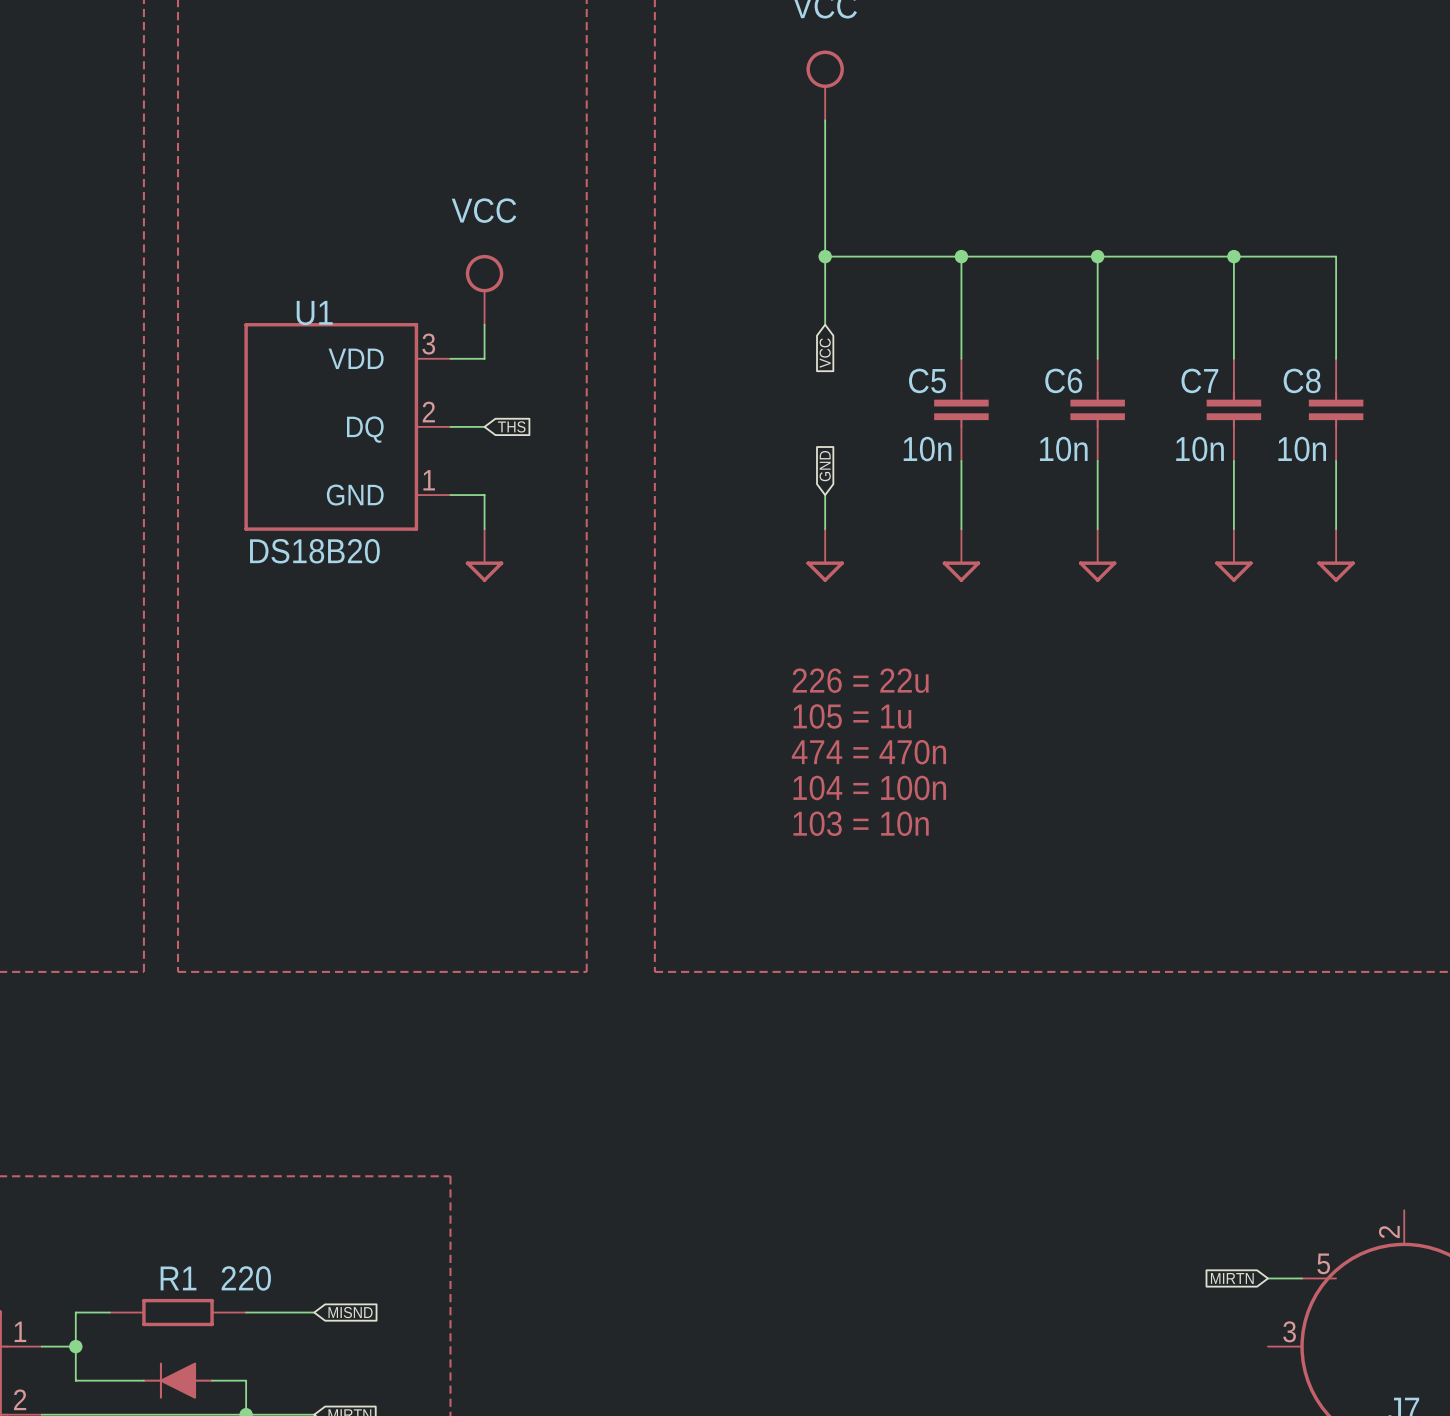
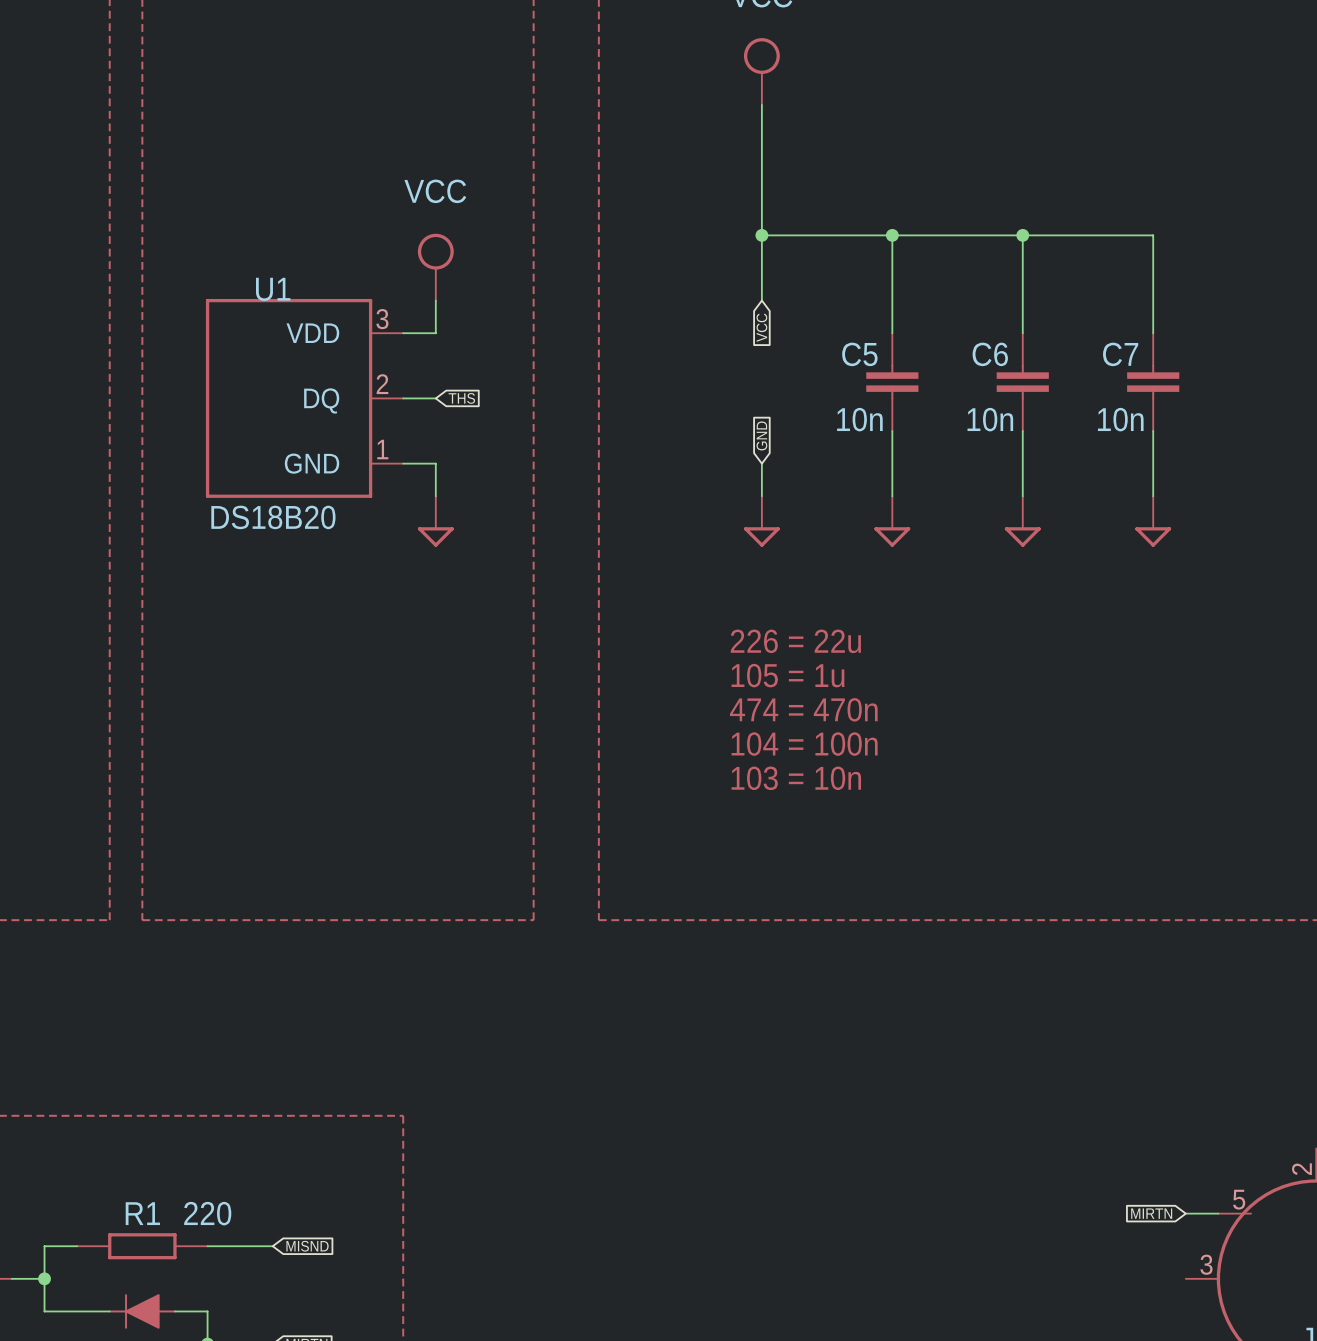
wire: (1233, 256) (1336, 256) (1336, 358) -> none
junction: (1233, 256) -> none
C8: 10n (1336, 409) -> none
wire: (1336, 460) (1336, 529) -> none
power symbol: (1336, 555) -> none

